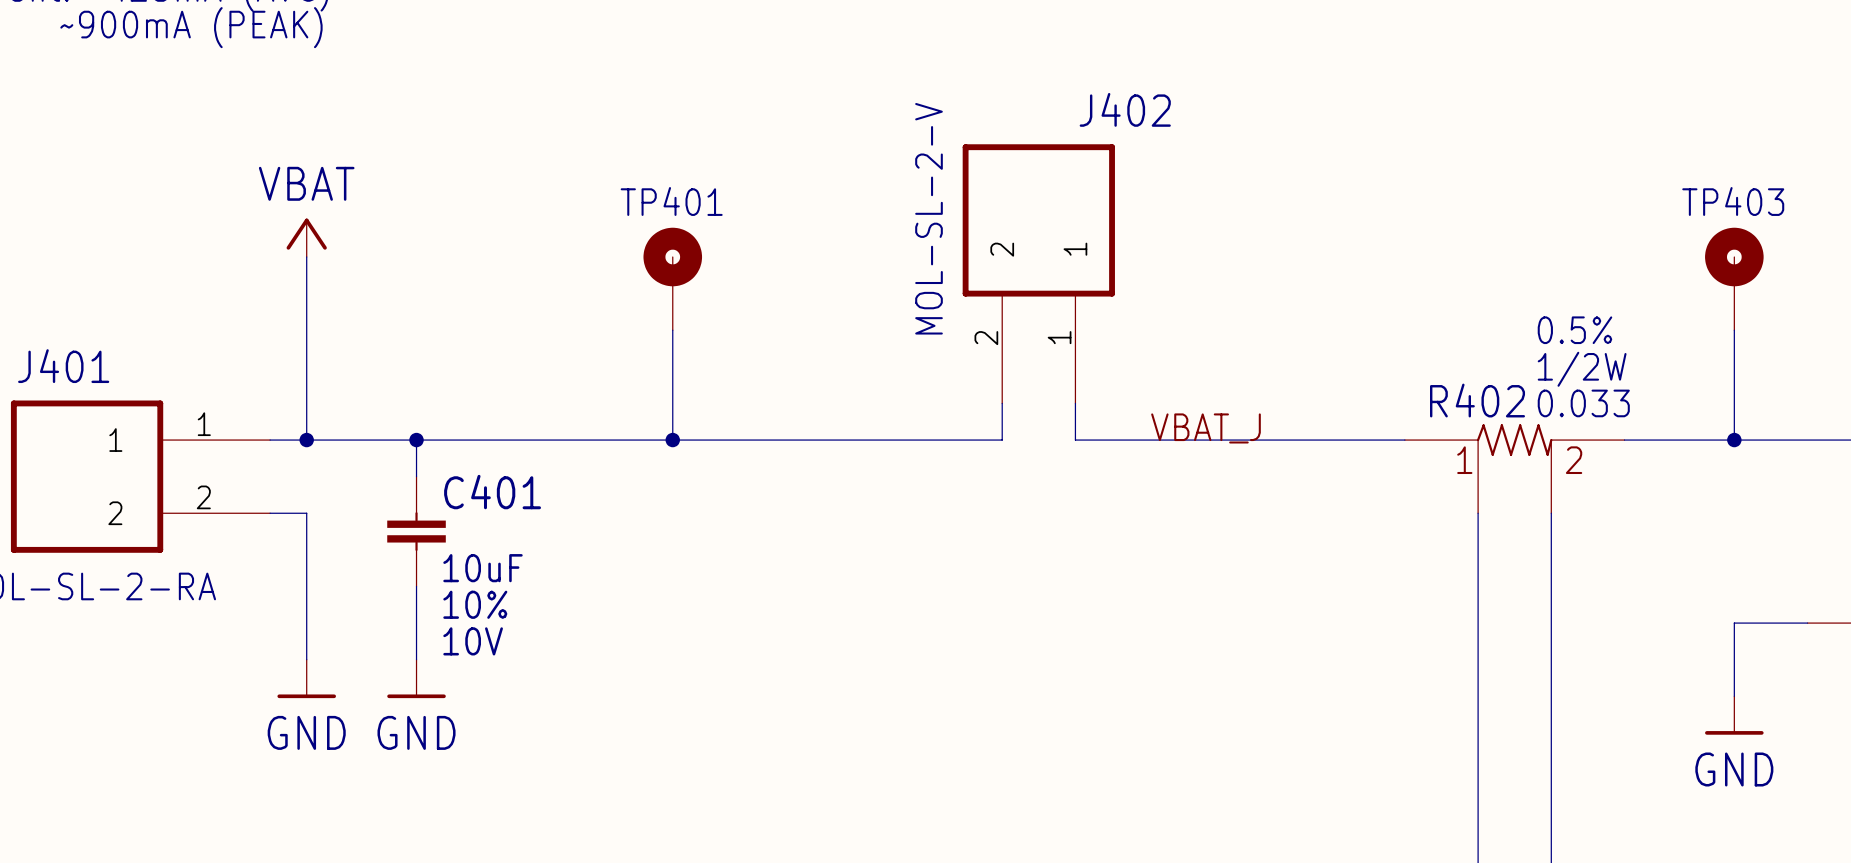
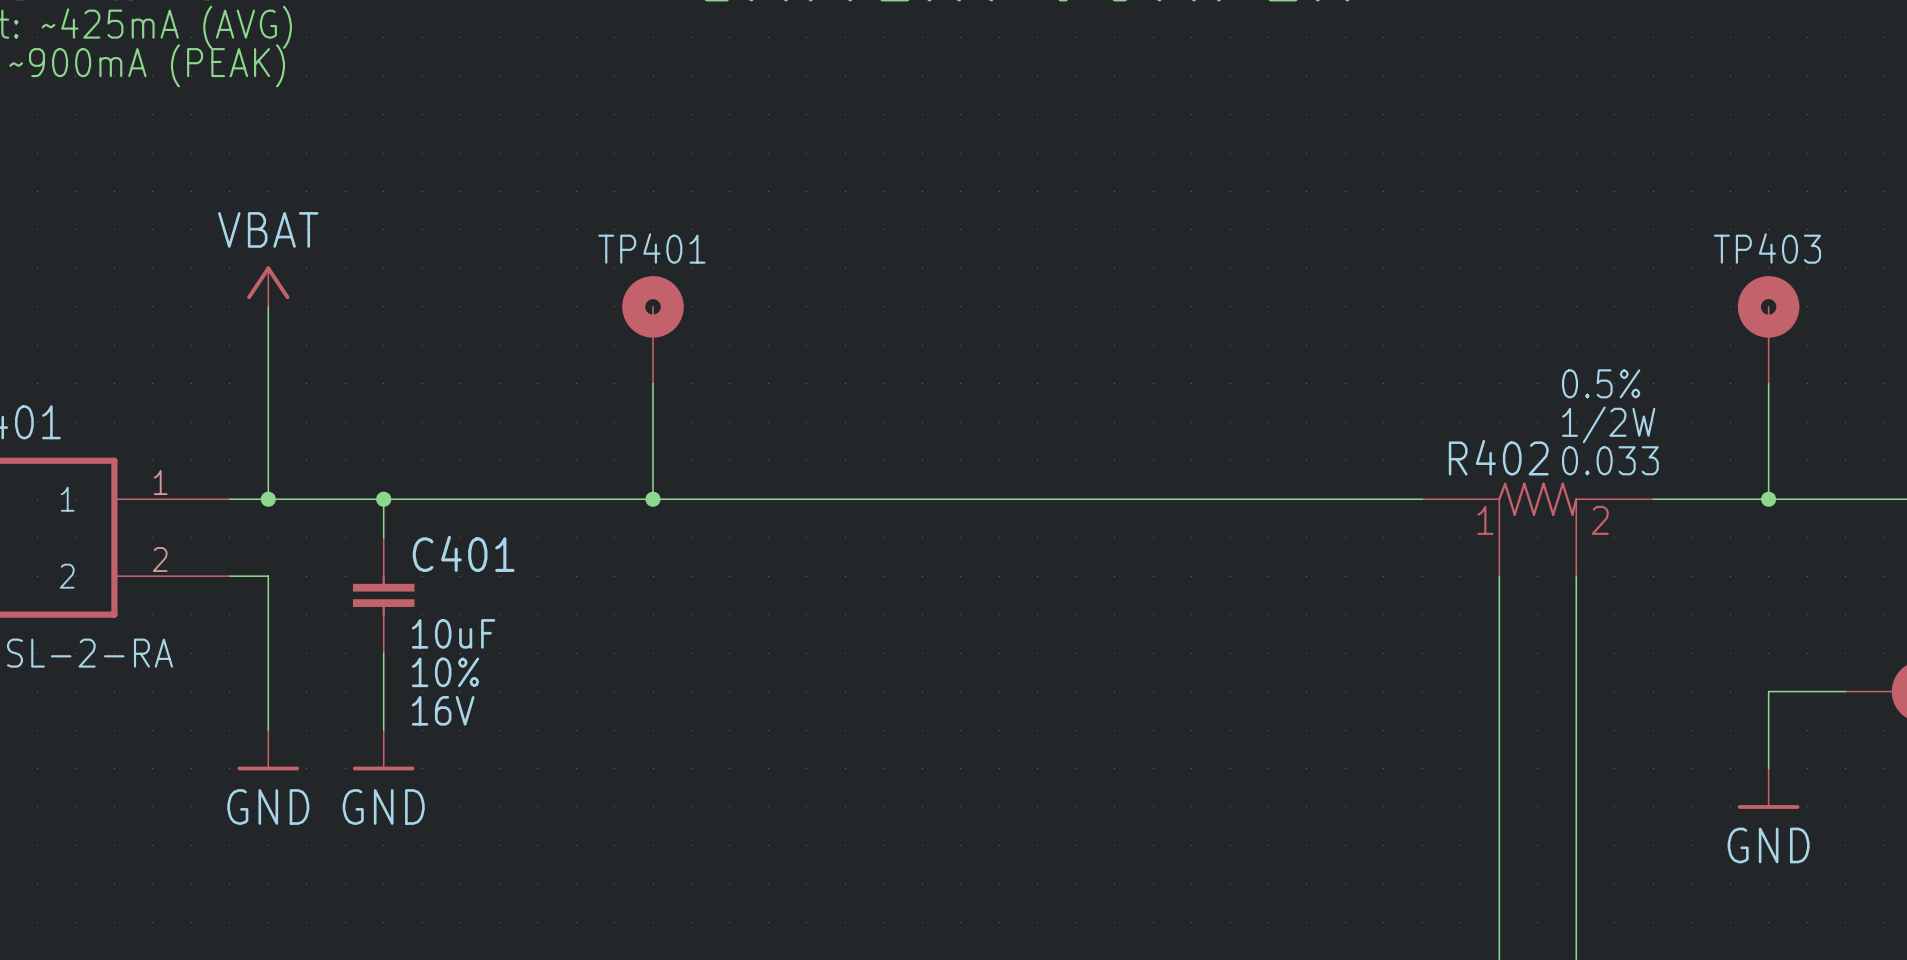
J402: MOL-SL-2-V (1038, 273) -> none
wire: (1002, 403) (1002, 440) -> (1076, 499) (999, 499)
wire: (1075, 403) (1075, 440) -> none
label: VBAT_J (1205, 428) -> none
C401 text: 10V (473, 641) -> 16V (443, 710)

